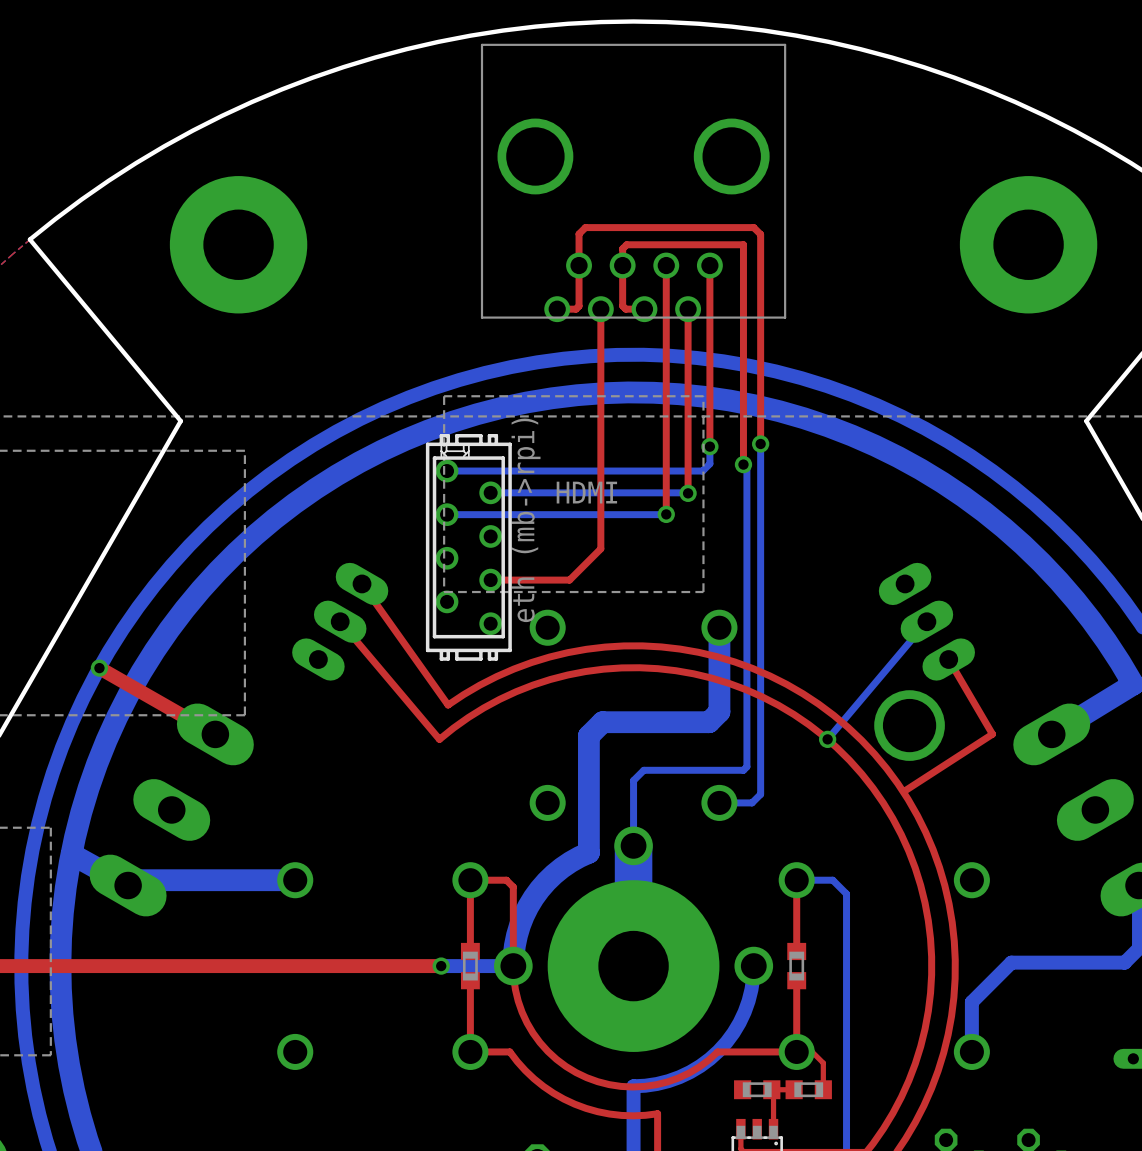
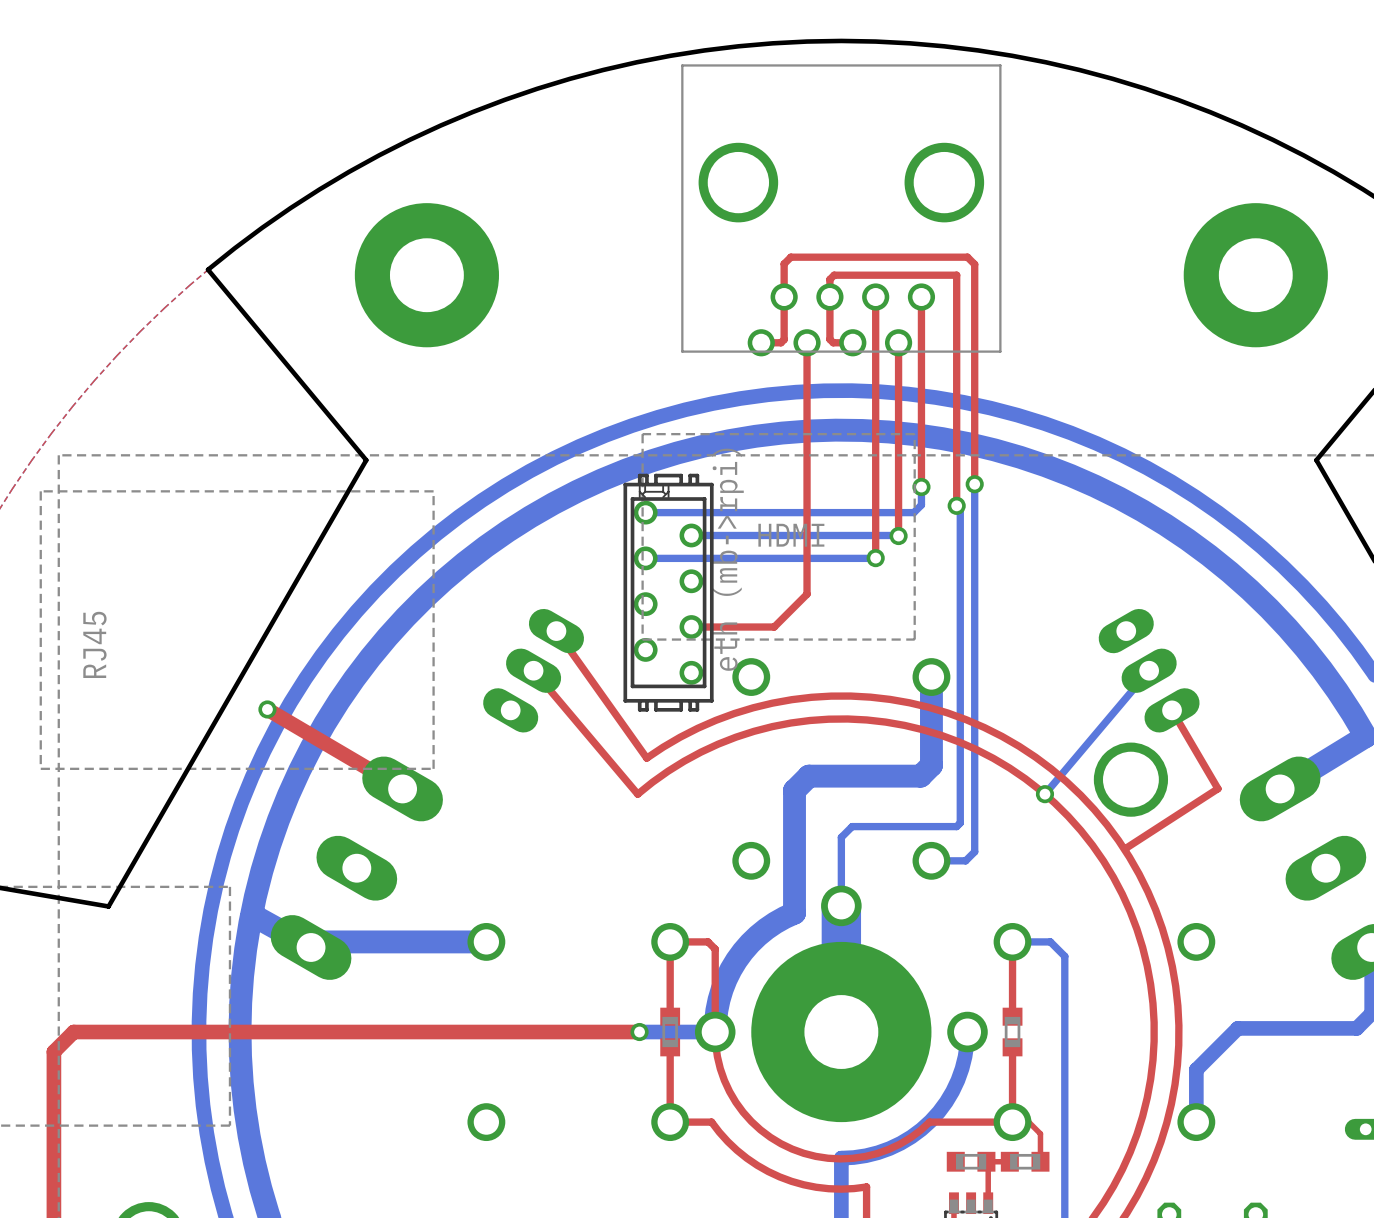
top track: (99, 668) (215, 734) -> (267, 709) (402, 788)
via position: (99, 668) -> (267, 709)

